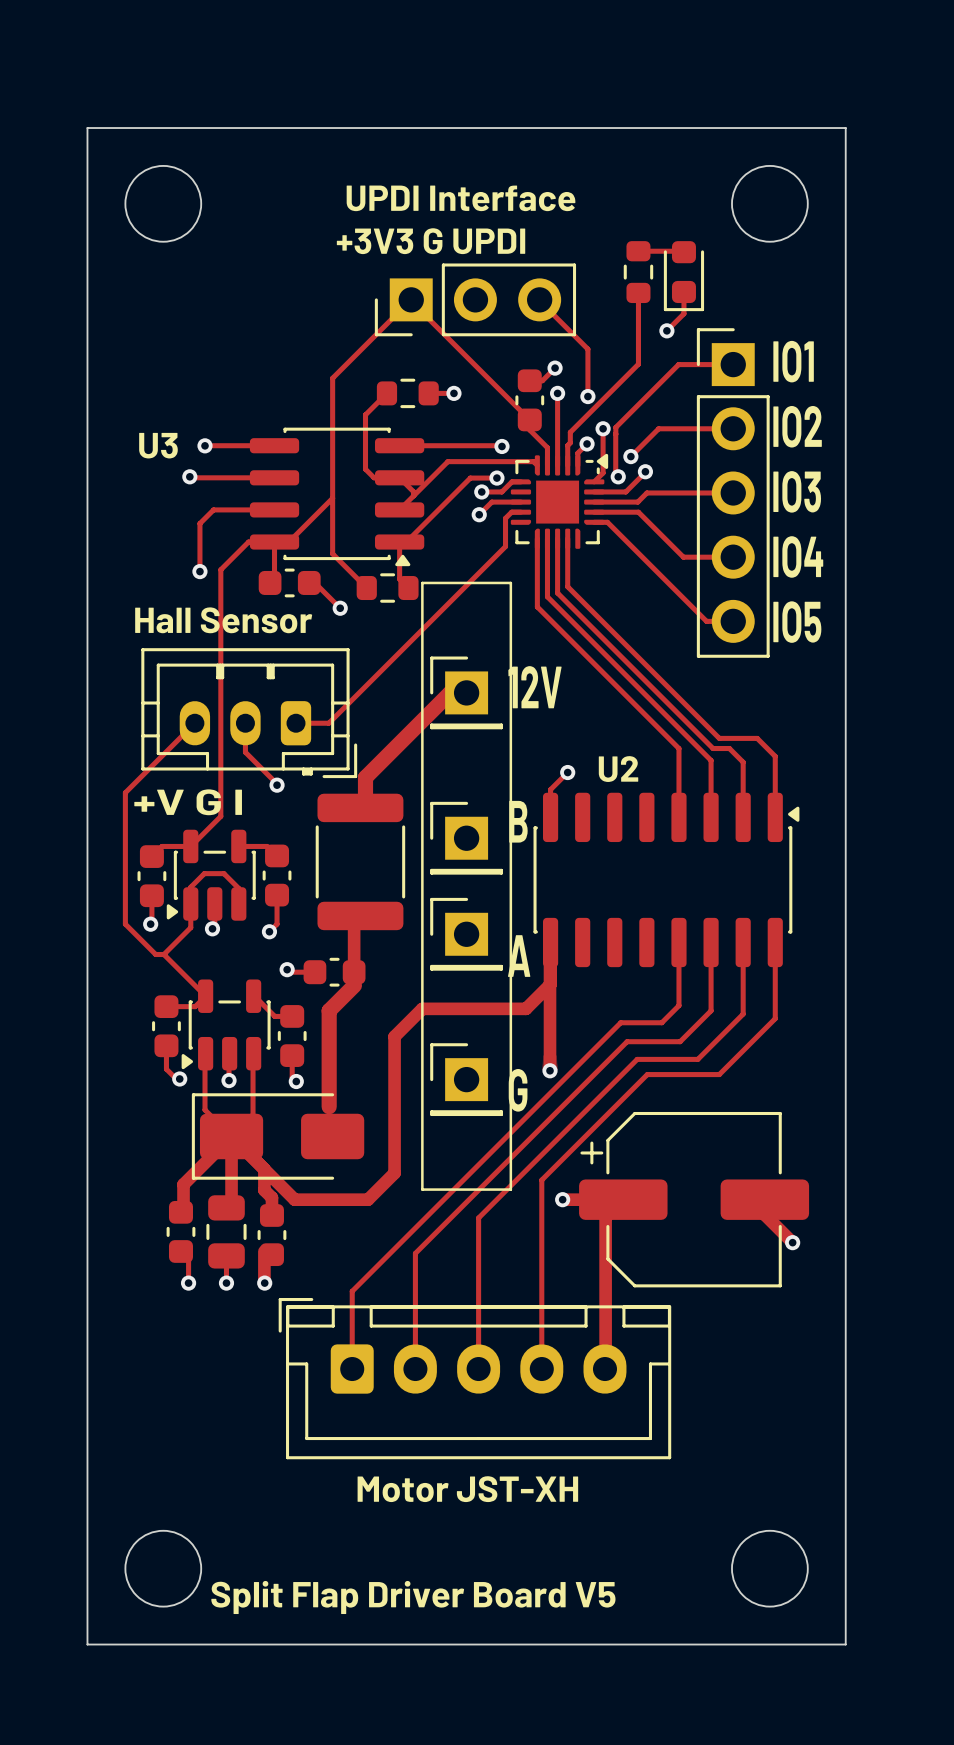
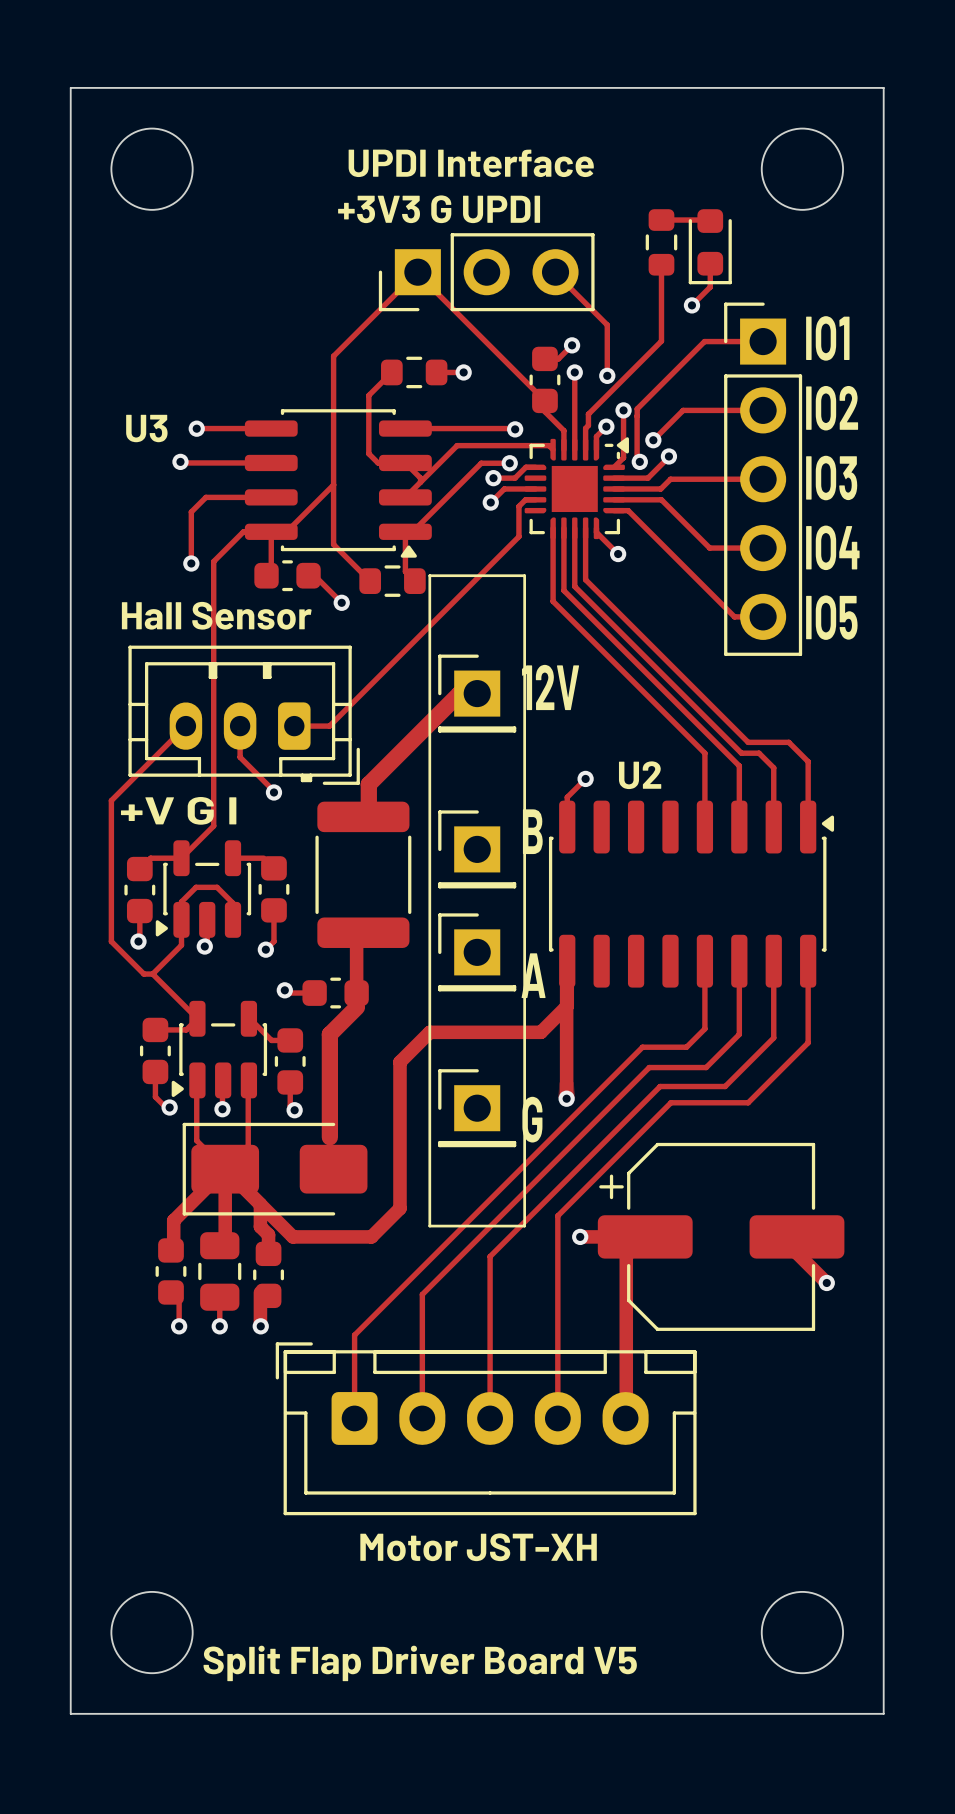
track: none -> (596, 528) (596, 532) (618, 554)
via: none -> (618, 554)

